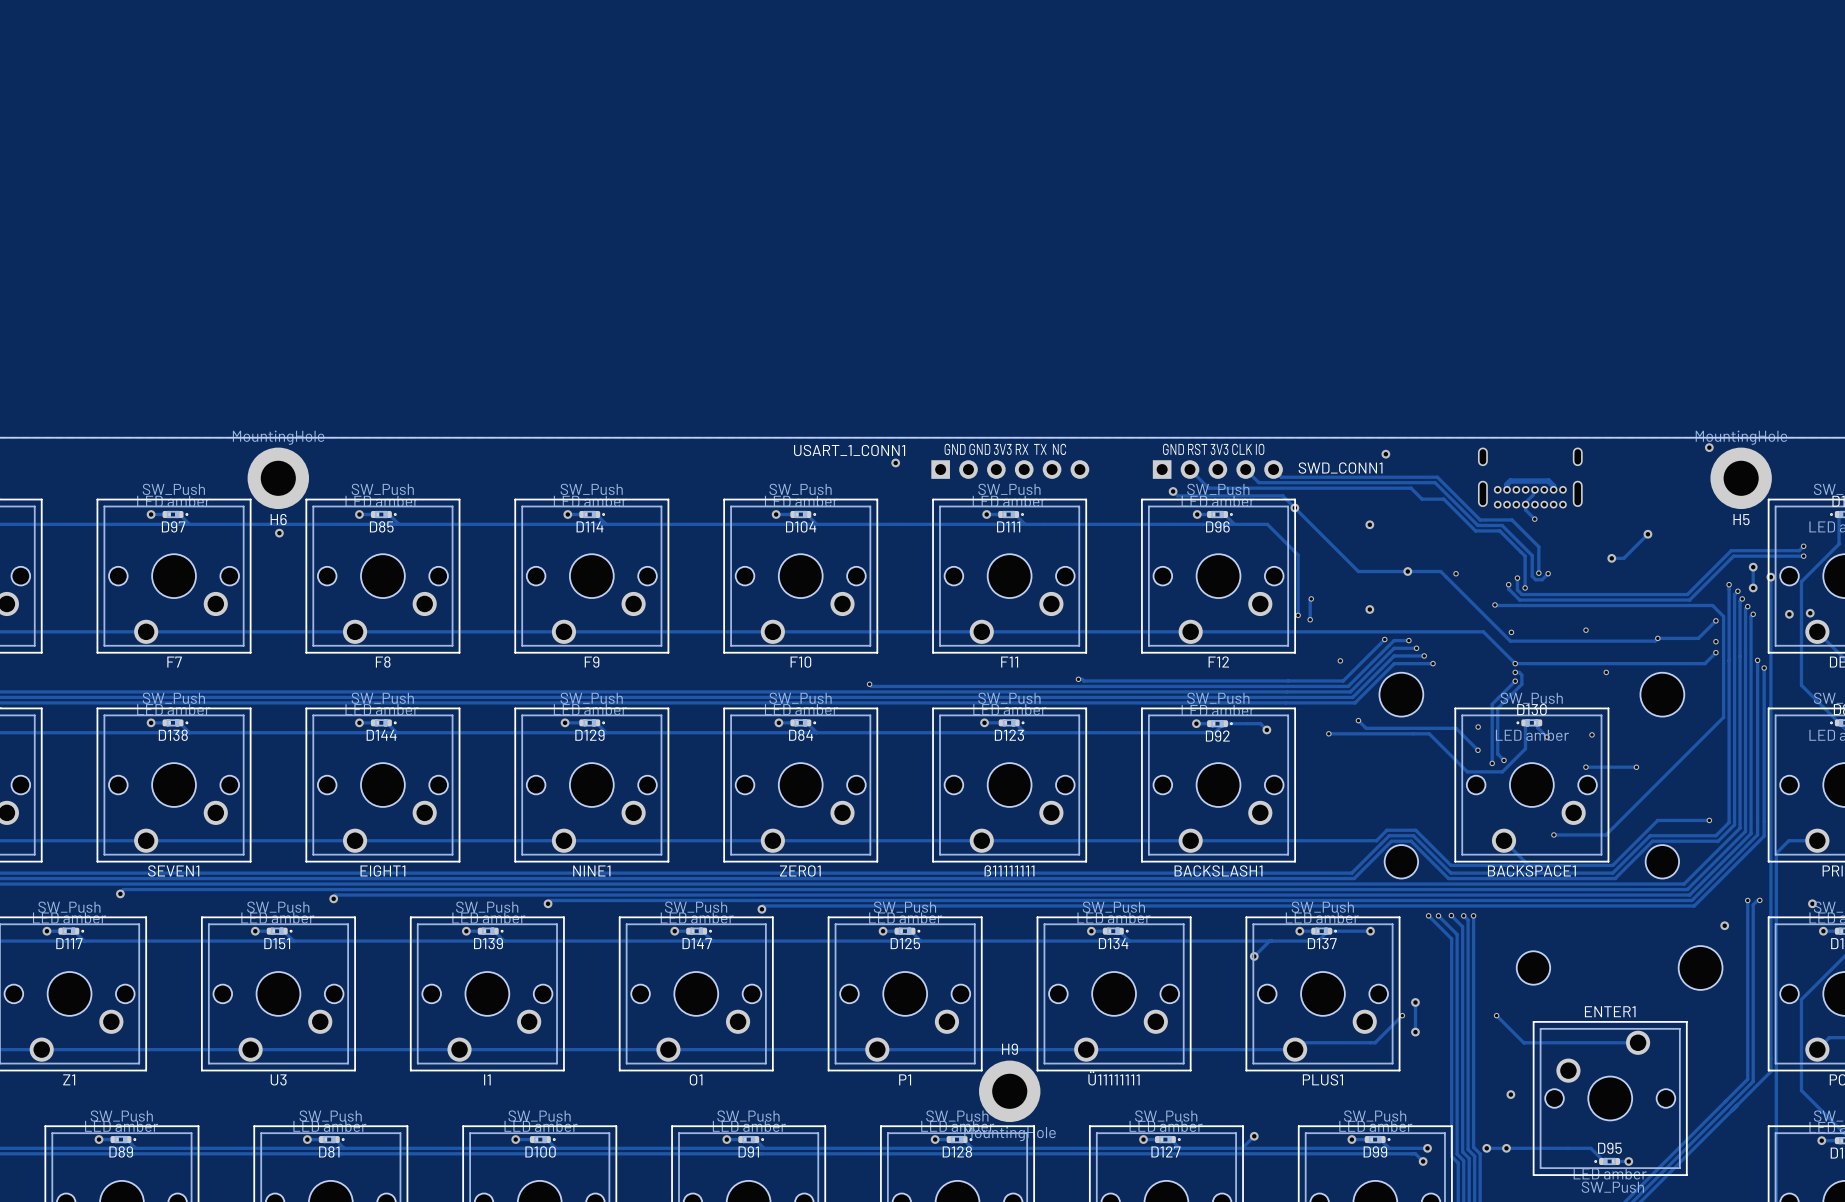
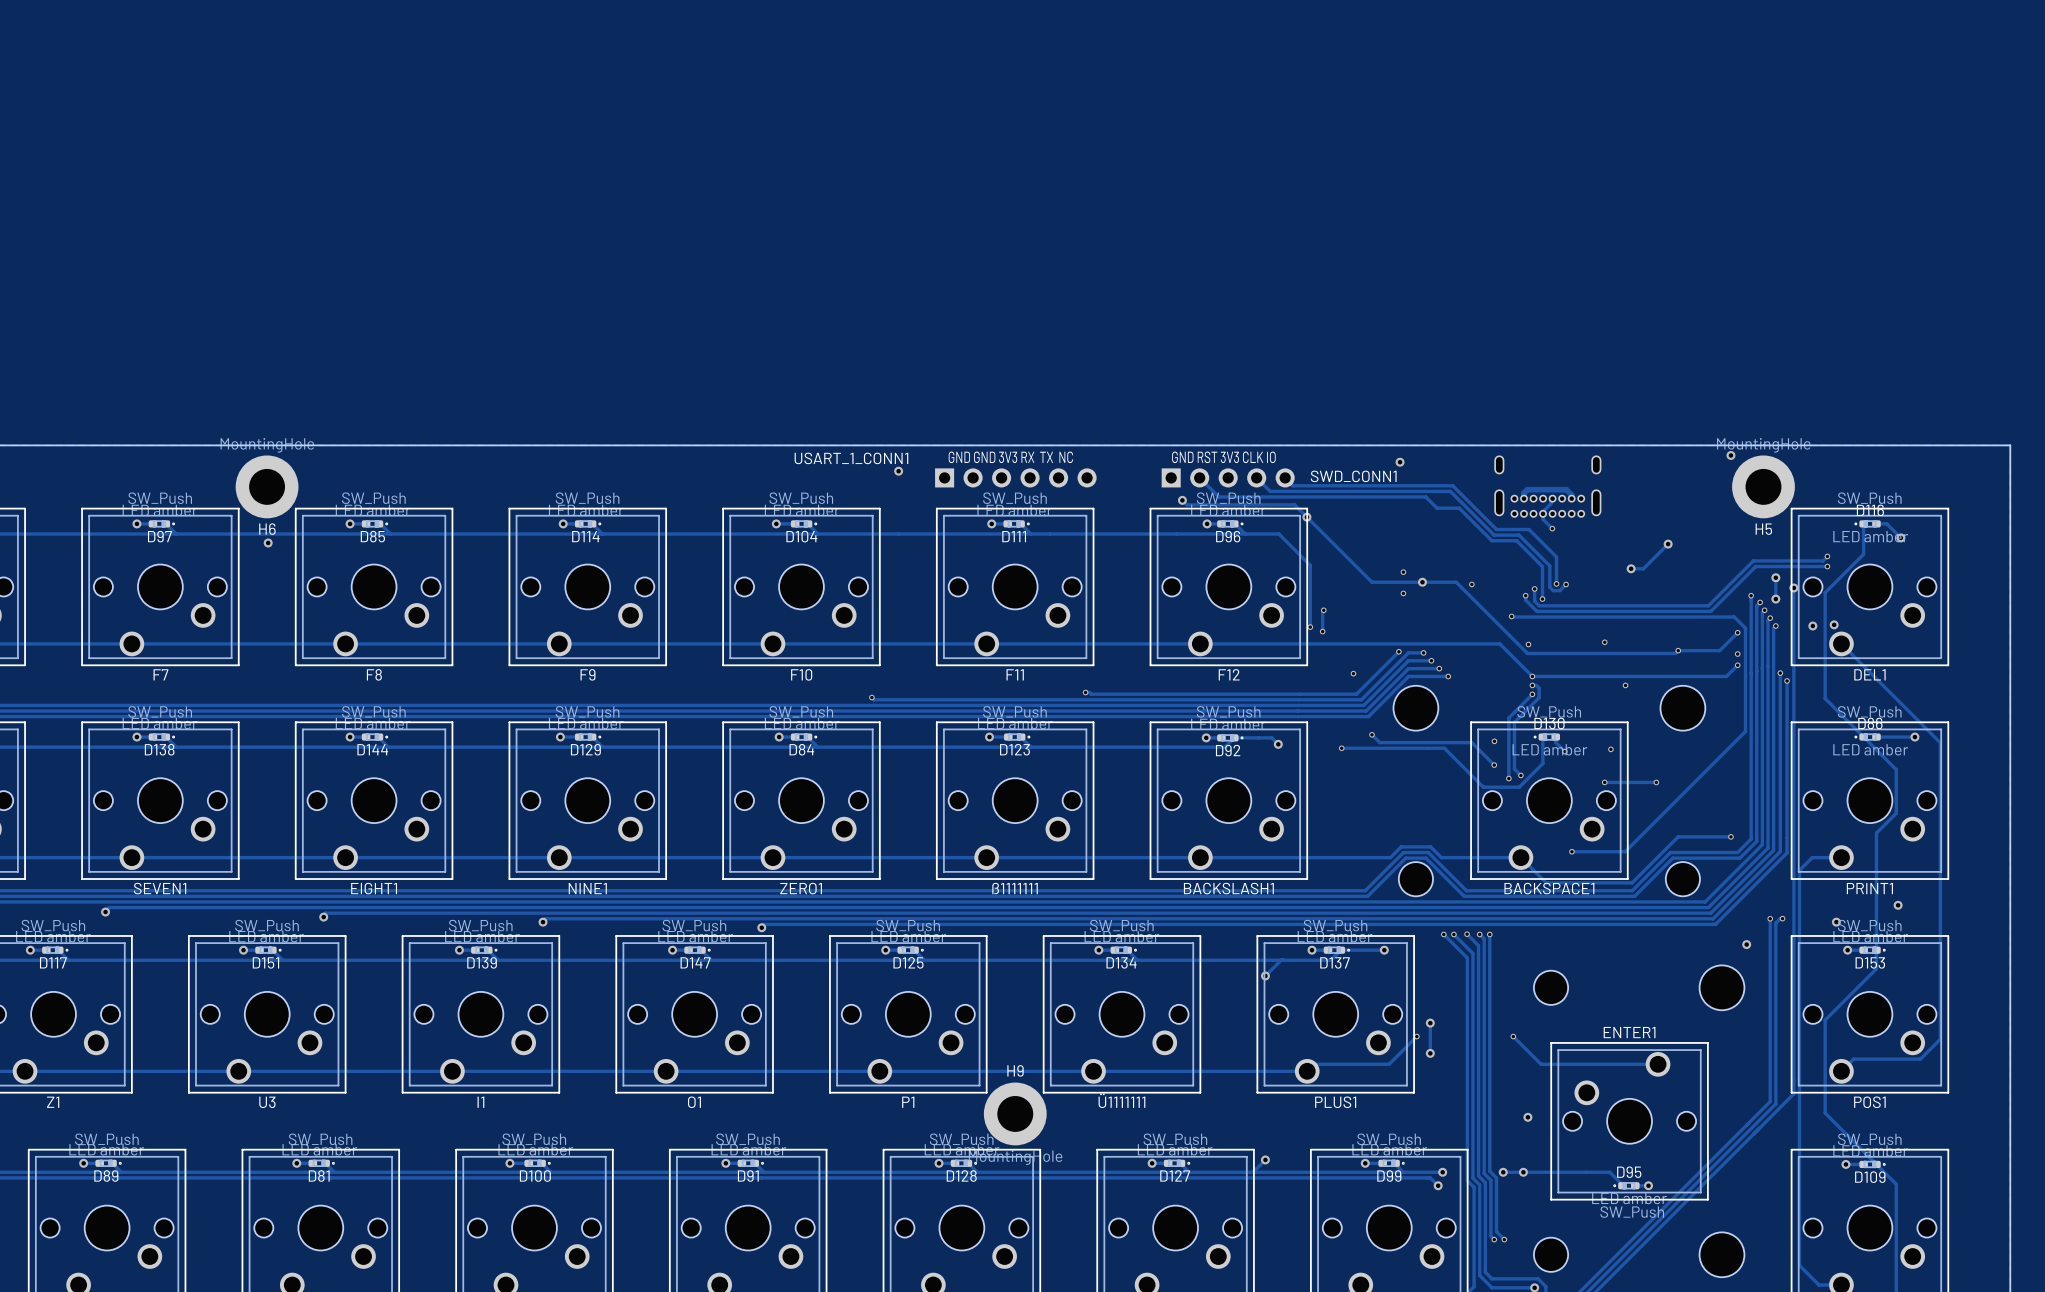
via: (1369, 524) -> none
via: none -> (1403, 572)
via: none -> (1403, 593)
via: (1369, 609) -> none
track: (1426, 840) (1450, 865) (1528, 865) -> (1441, 857) (1520, 857)
ß11111111 name: ß11111111 (1009, 870) -> ß1111111 (1015, 888)
Ü11111111 name: Ü11111111 (1114, 1078) -> Ü1111111 (1121, 1100)

